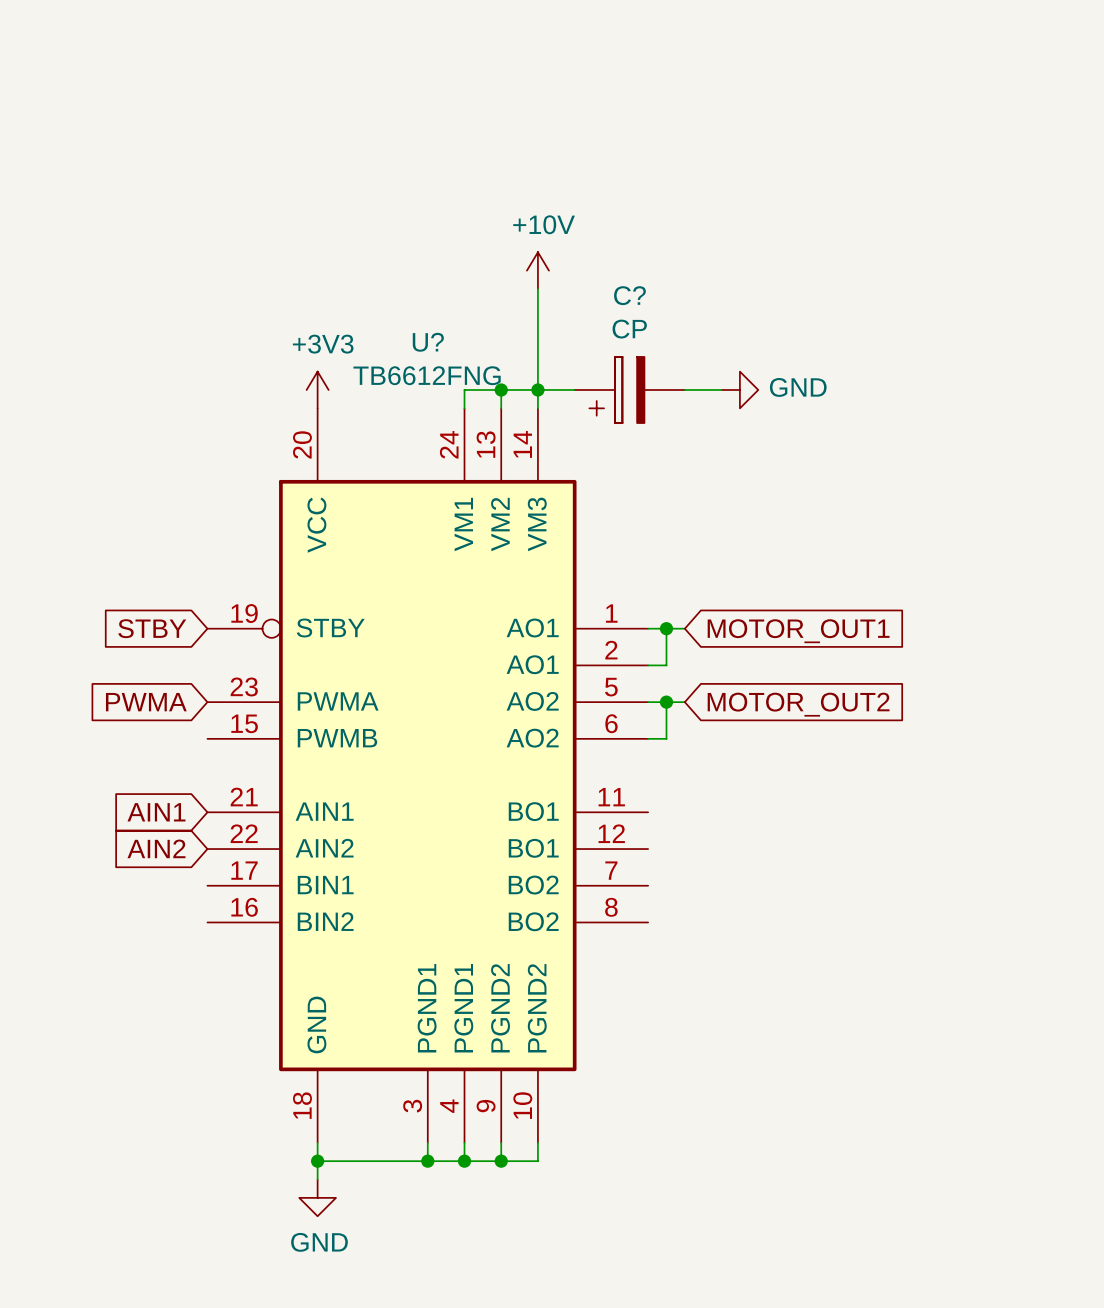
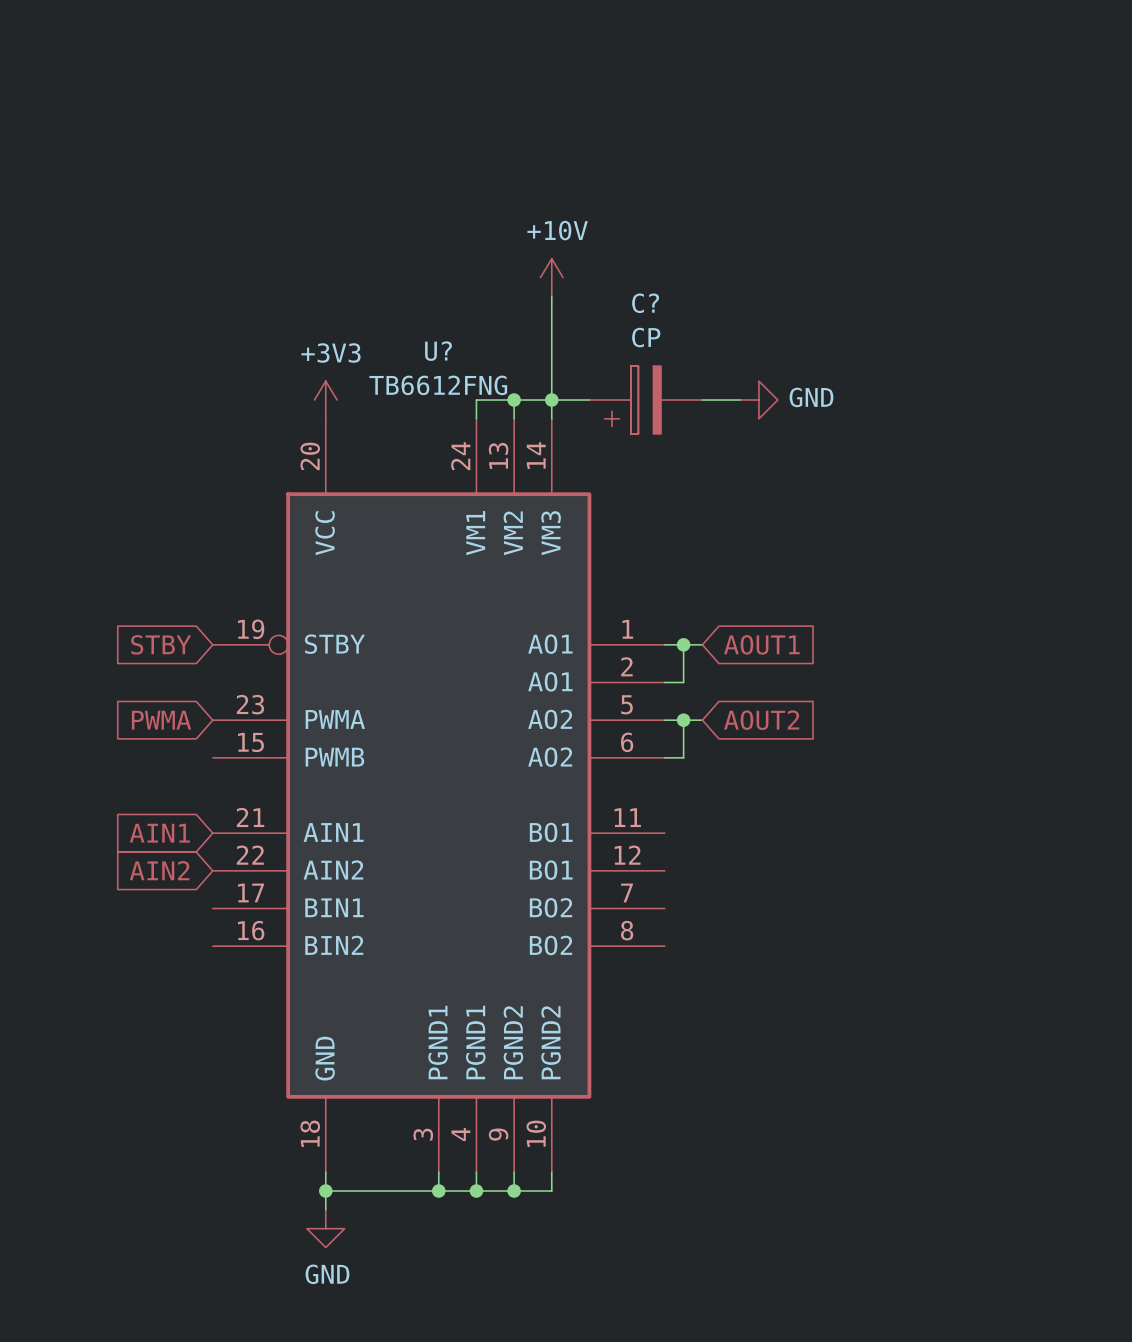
global label: MOTOR_OUT1 (798, 631) -> AOUT1 (761, 644)
global label: MOTOR_OUT2 (798, 704) -> AOUT2 (761, 720)

